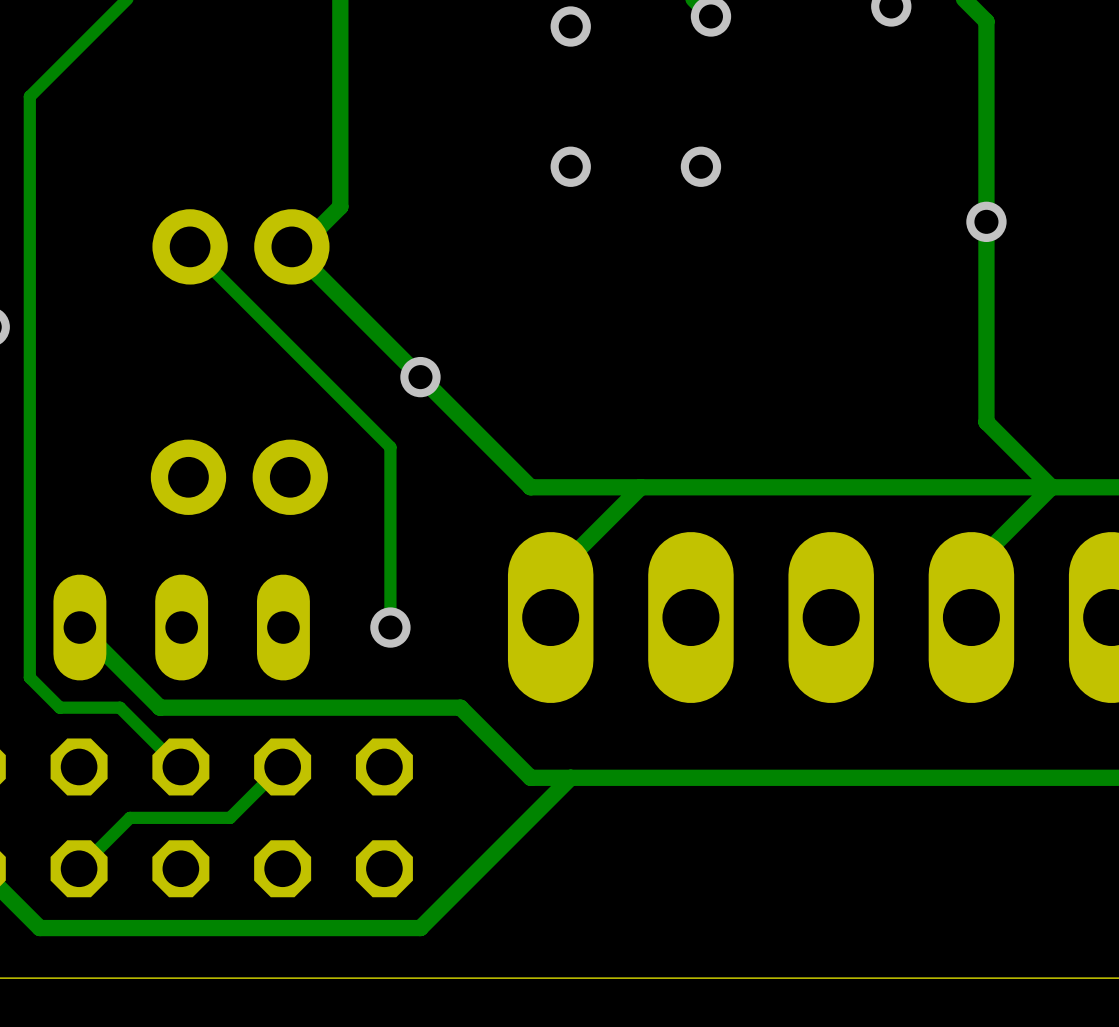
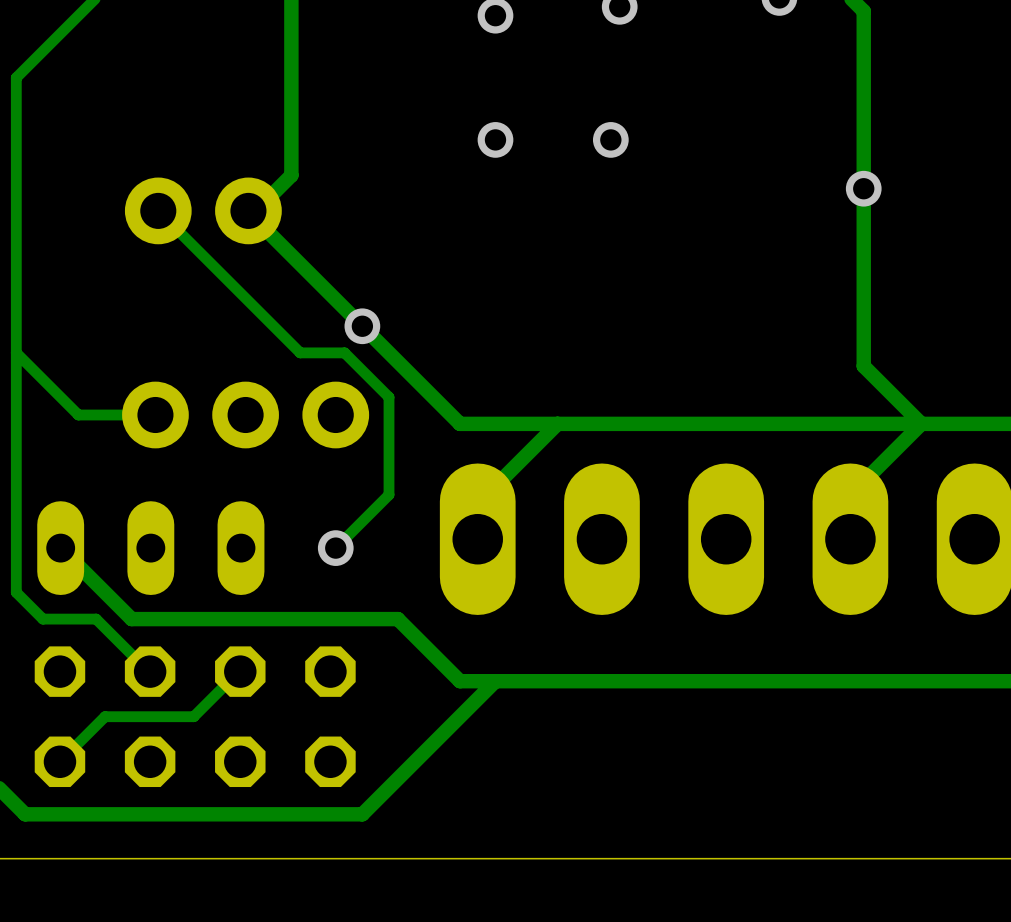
track: none -> (16, 352) (78, 415) (155, 415)
track: (350, 407) (390, 447) (390, 627) -> (300, 352) (344, 352) (389, 397) (389, 494) (335, 548)
part: (239, 477) -> none
part: none -> (245, 415)

